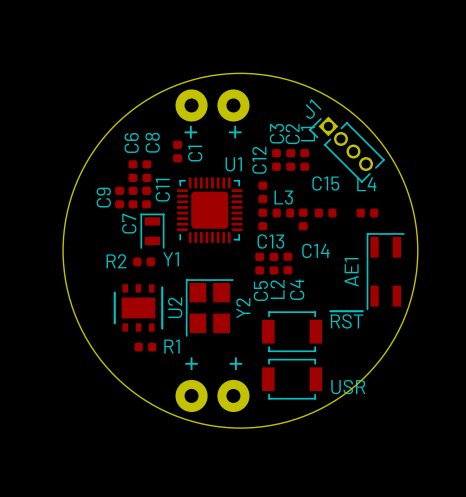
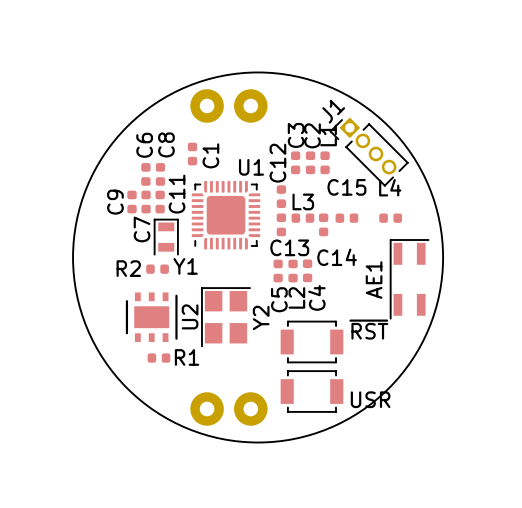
text: + (190, 132) -> none
text: + (235, 132) -> none
text: + (191, 363) -> none
text: + (235, 363) -> none

